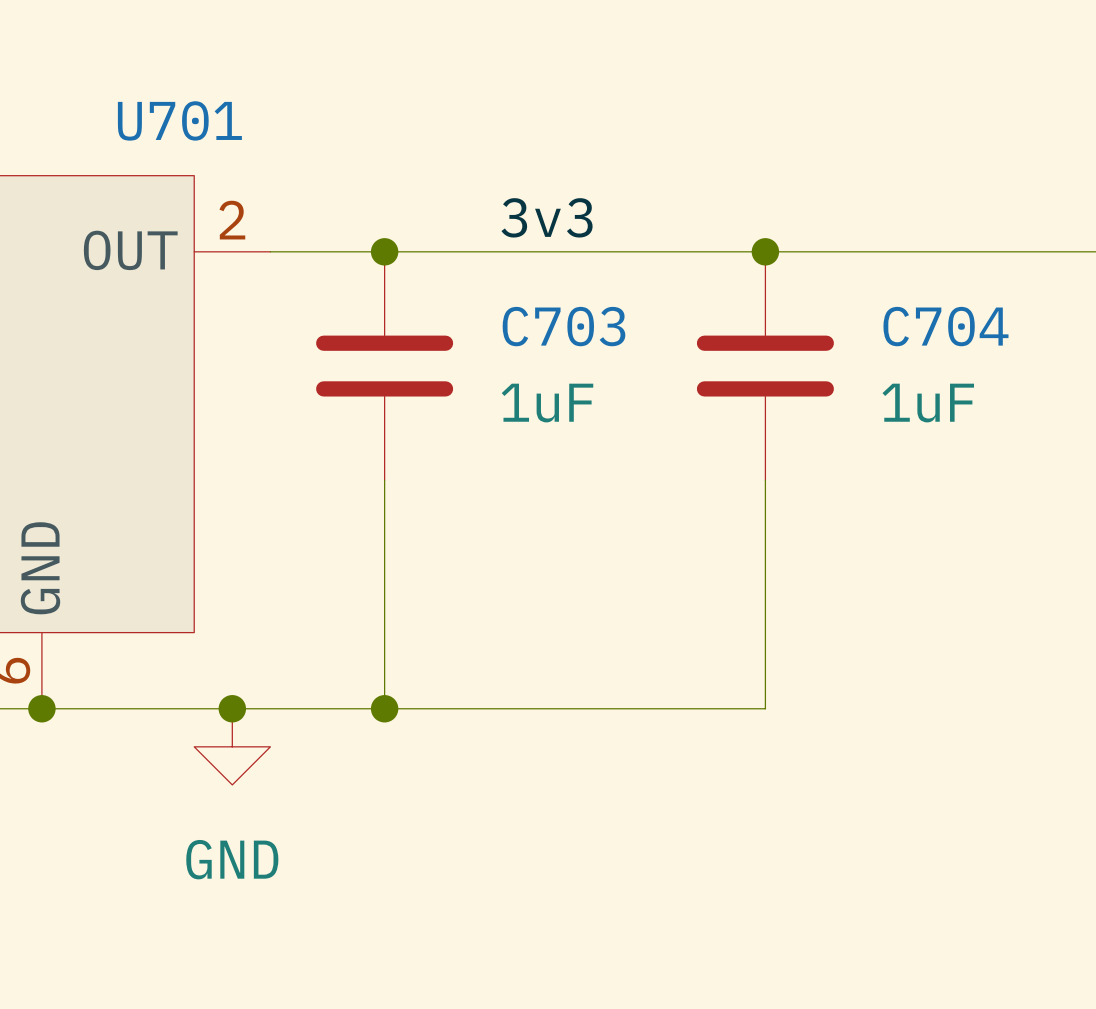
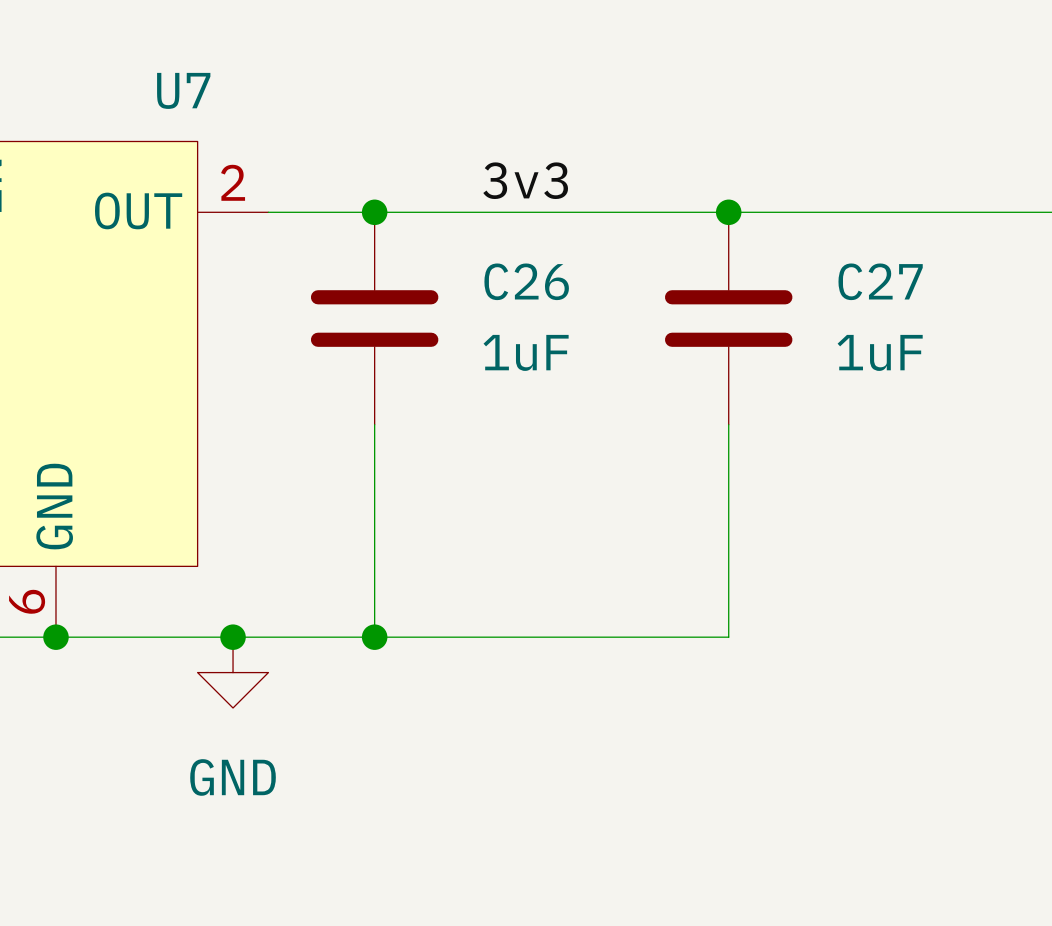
U701 name: U701 (179, 120) -> U7 (183, 90)
C703 name: C703 (563, 326) -> C26 (526, 281)
C704 name: C704 (945, 326) -> C27 (880, 281)

